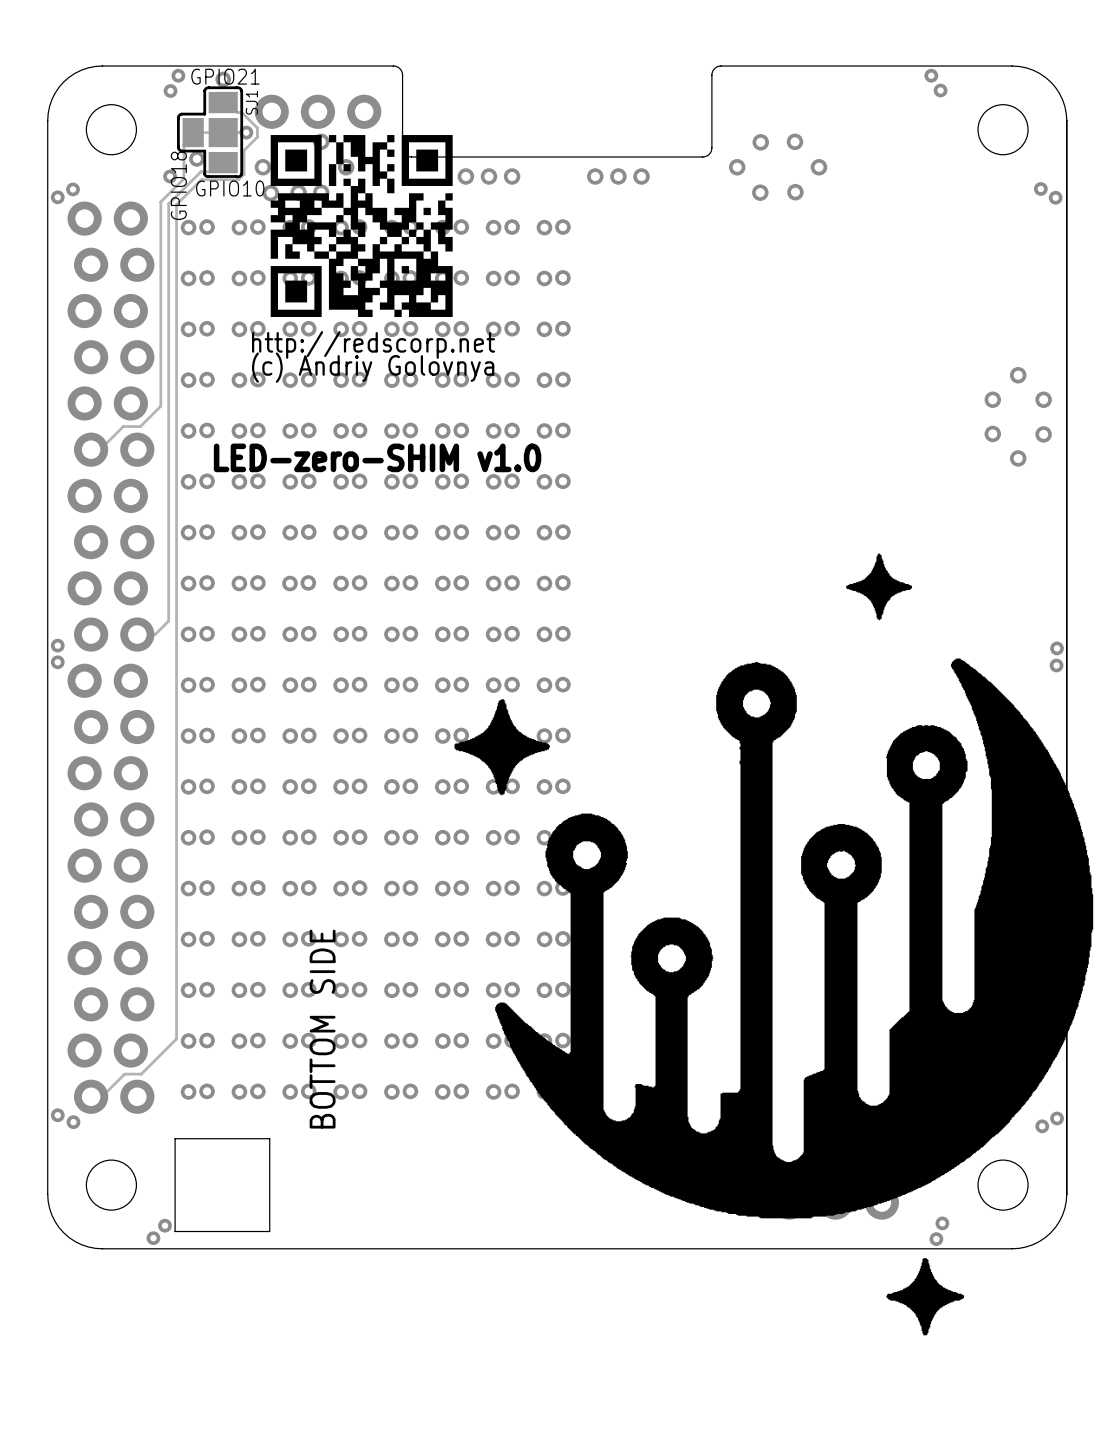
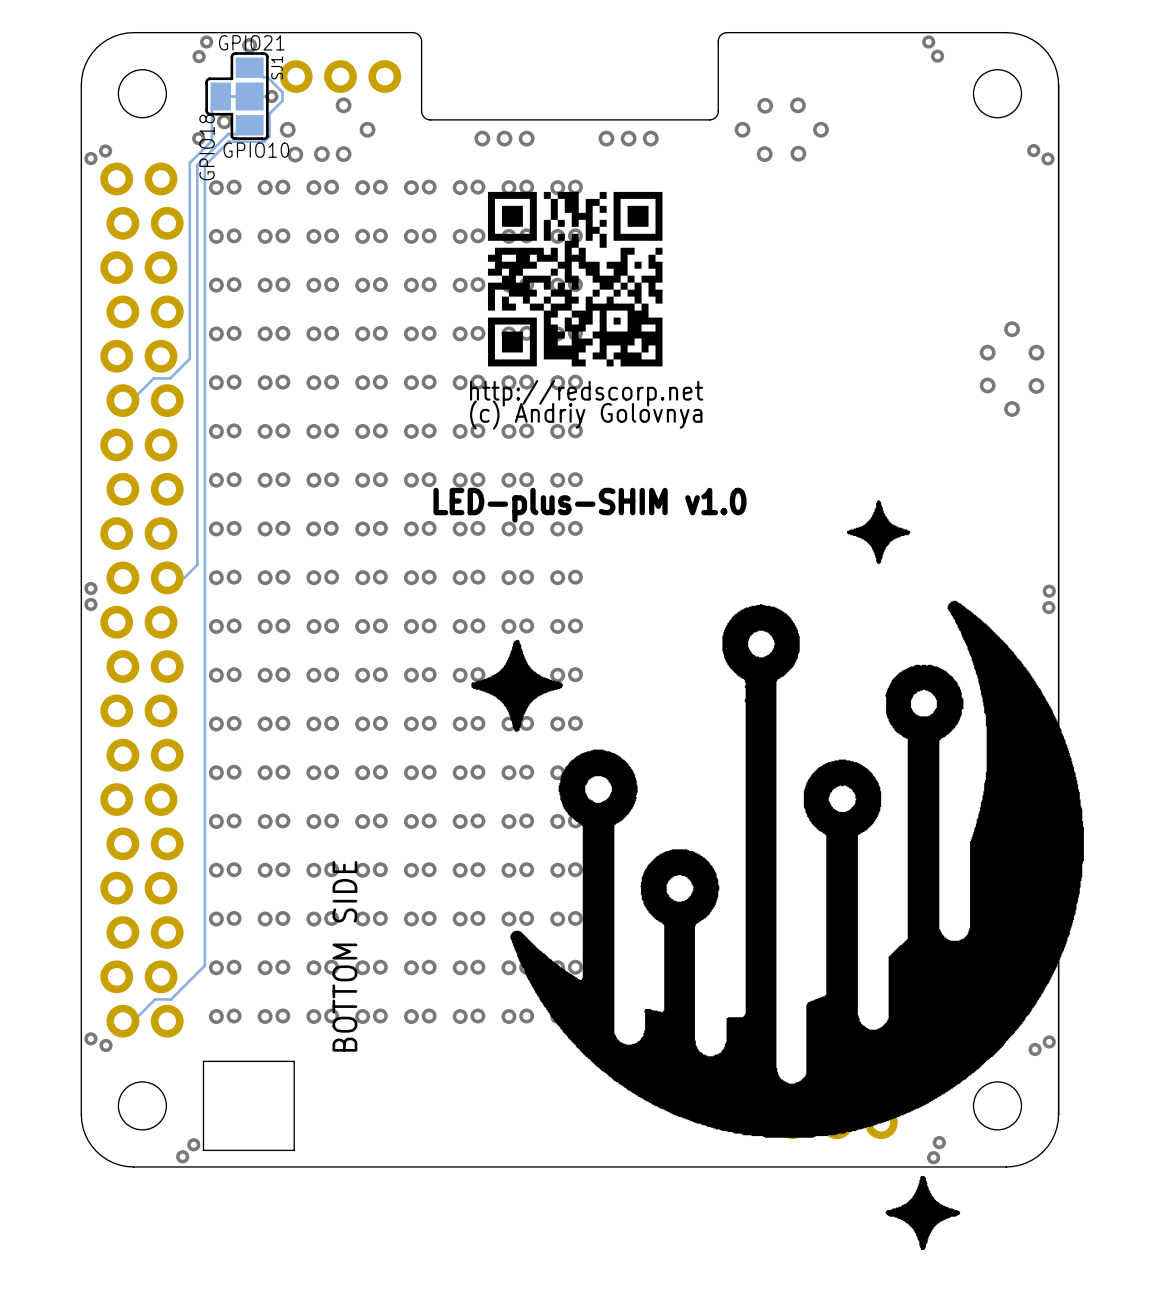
drawing position: (361, 226) -> (575, 279)
text position: http://redscorp.net (373, 344) -> http://redscorp.net (586, 393)
text position: (c) Andriy Golovnya (373, 367) -> (c) Andriy Golovnya (586, 415)
text: LED-zero-SHIM v1.0 (377, 457) -> none
text: none -> LED-plus-SHIM v1.0 (589, 505)

